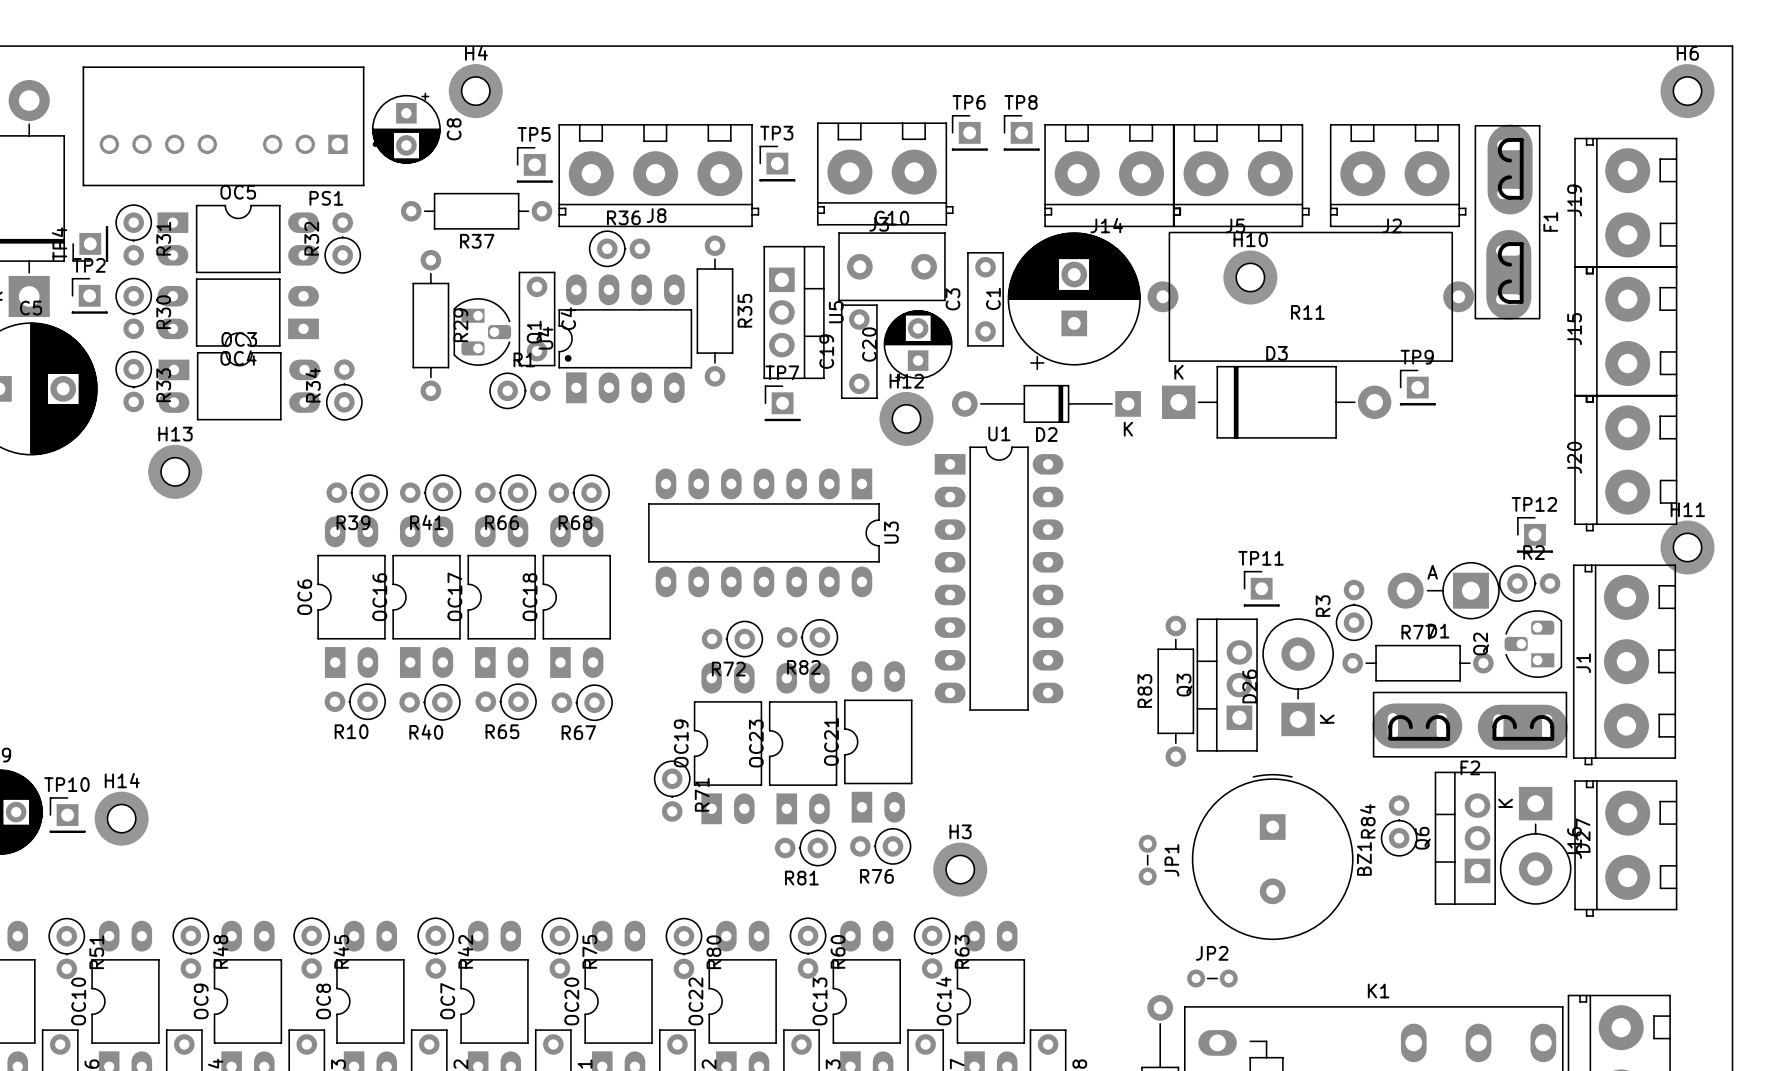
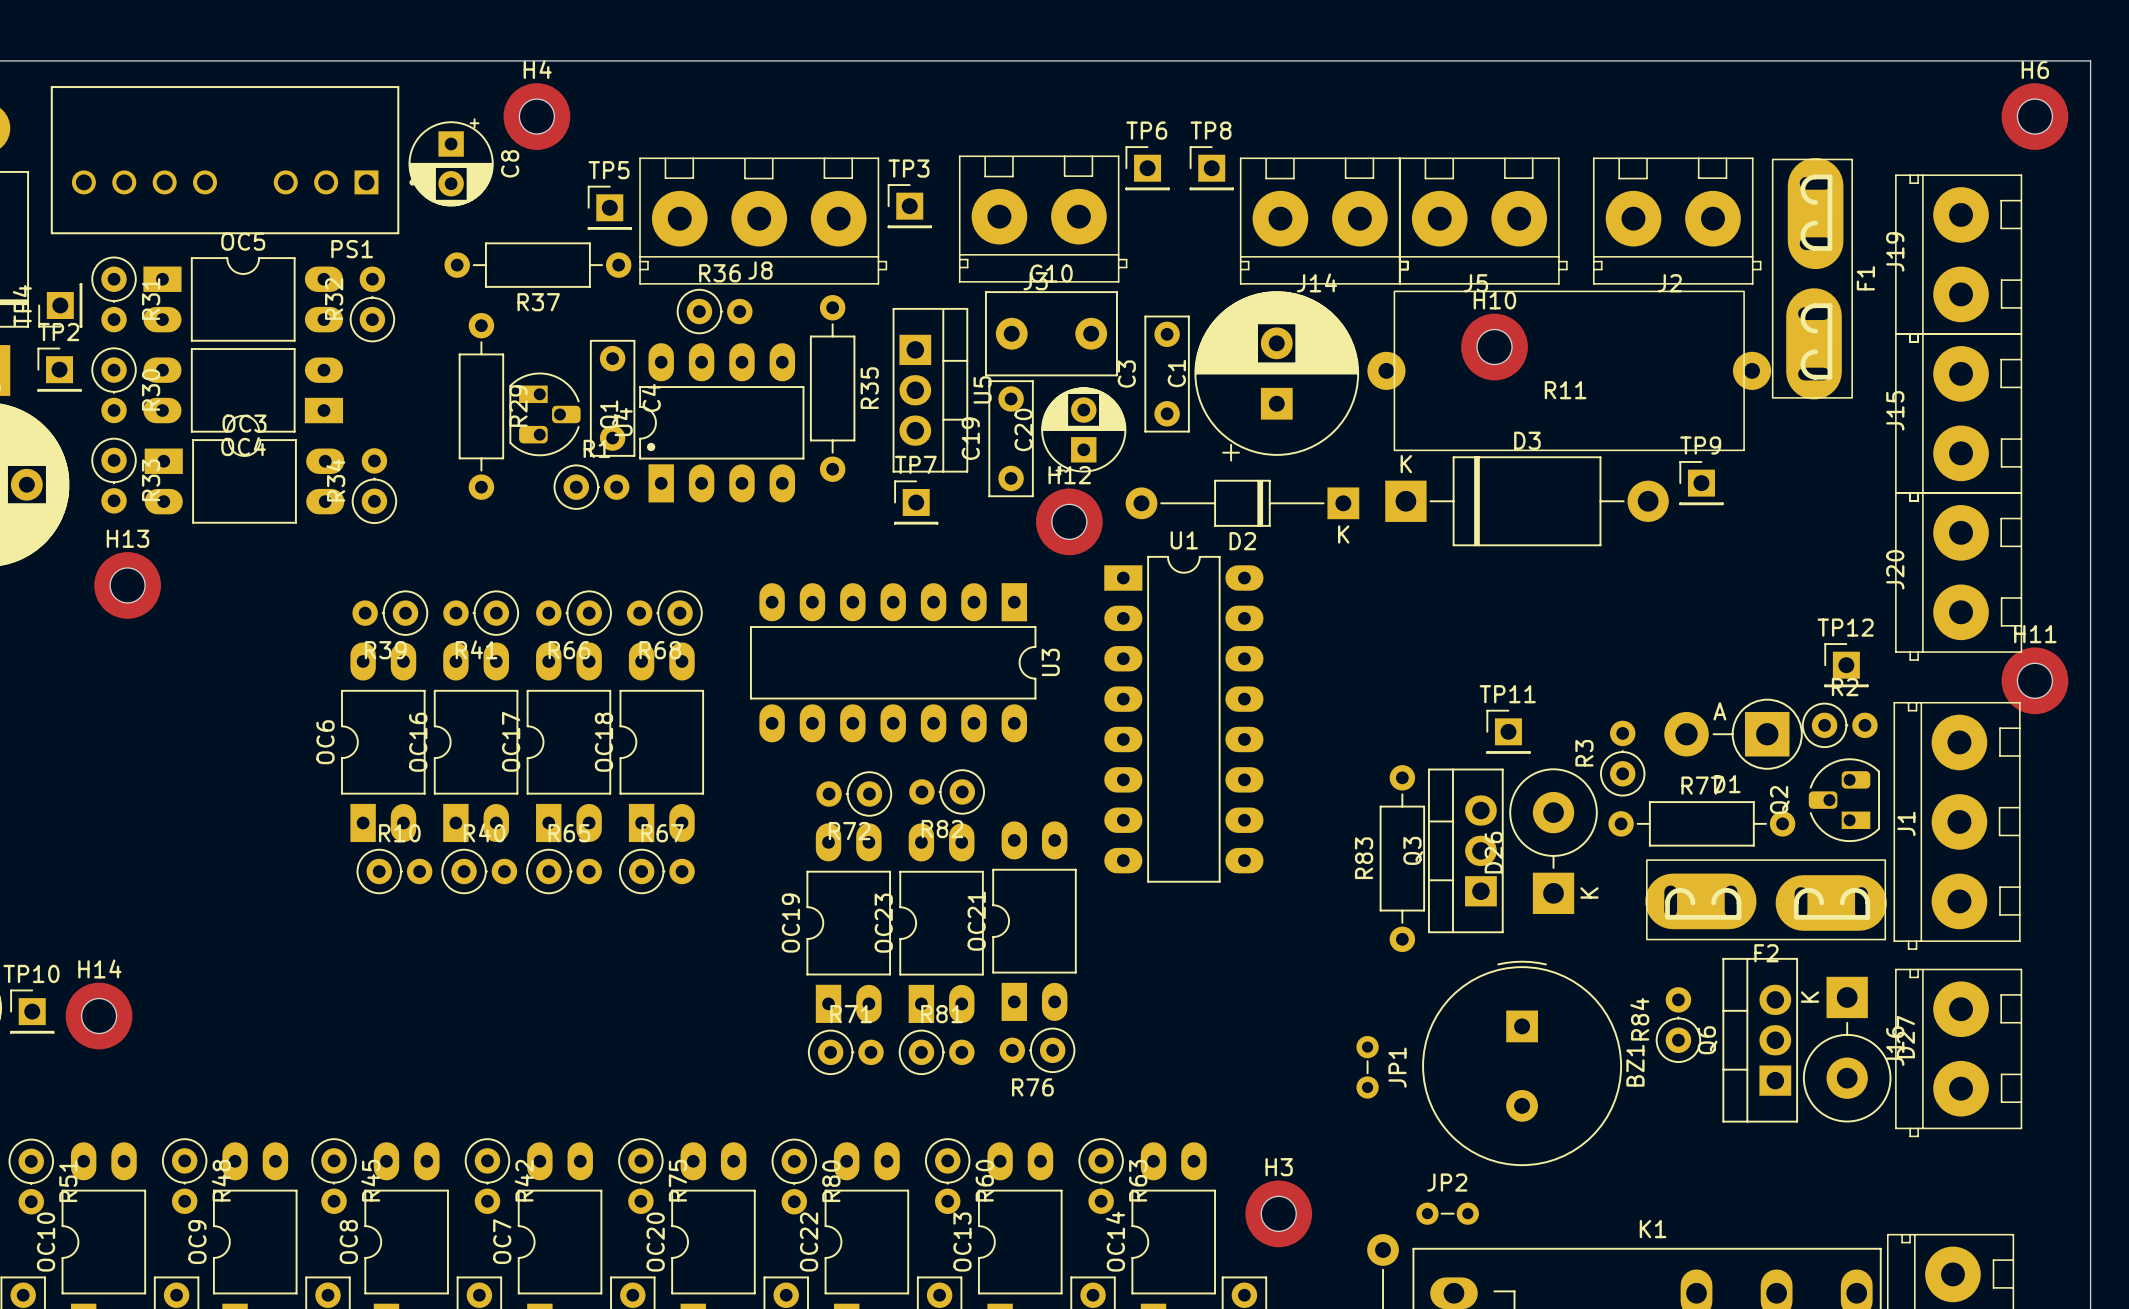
H13 position: (175, 471) -> (127, 585)
R10 rotation: 0° (355, 701) -> 180° (394, 871)
R65 rotation: 0° (506, 701) -> 180° (564, 871)
R40 rotation: 0° (430, 702) -> 180° (479, 871)
R67 rotation: 0° (582, 702) -> 180° (656, 871)
R71 rotation: 0° (672, 791) -> 90° counterclockwise (845, 1052)
R71 position: (672, 791) -> (845, 1052)
R81 rotation: 0° (805, 848) -> 180° (936, 1052)
H3 position: (960, 869) -> (1278, 1213)

